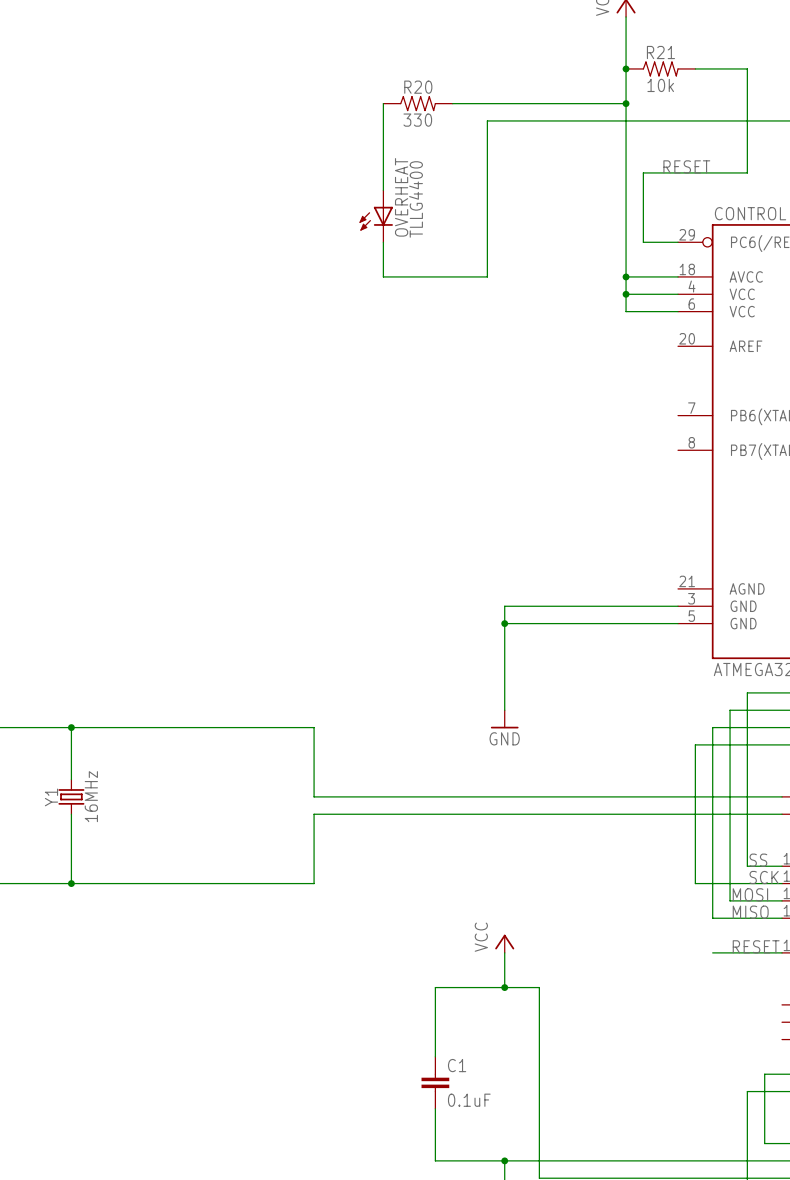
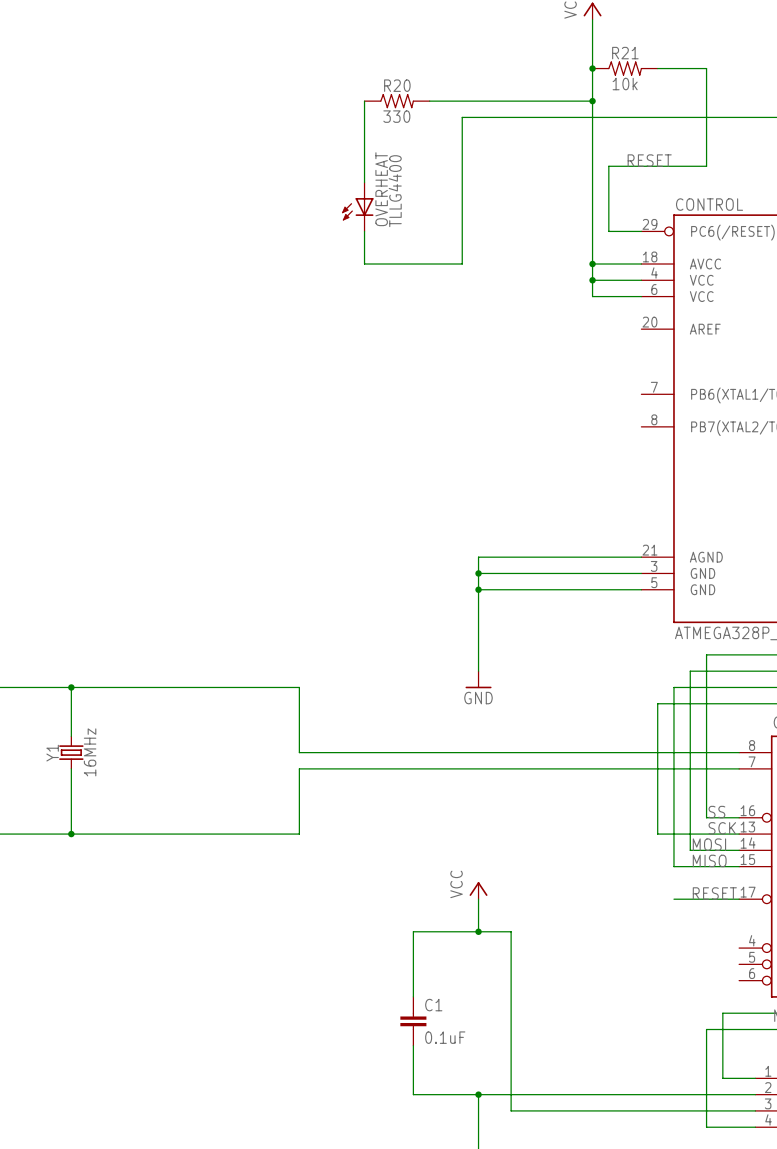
wire: none -> (641, 557) (478, 557) (478, 573)
junction: none -> (478, 573)

